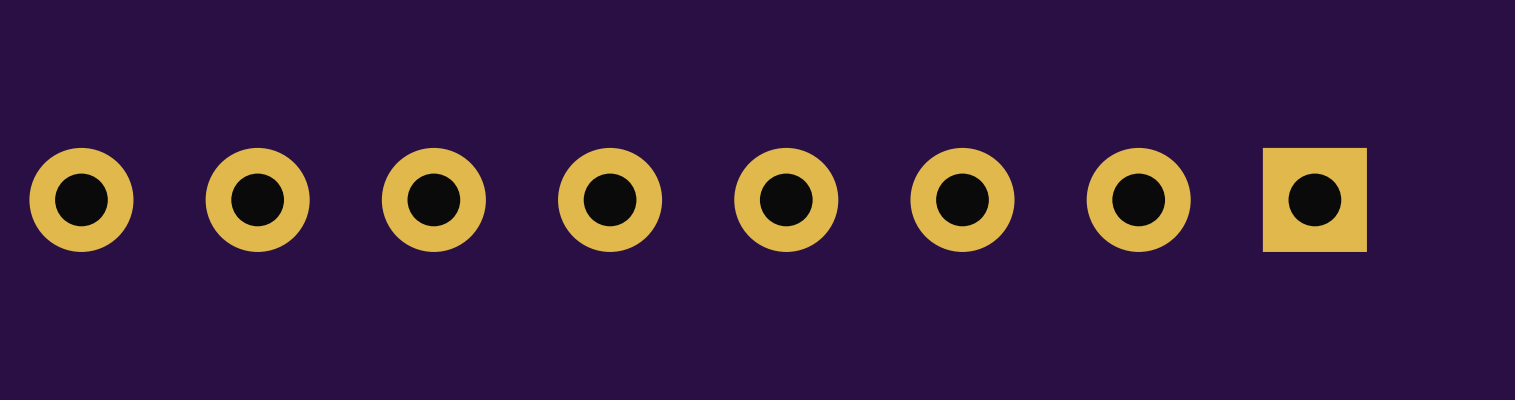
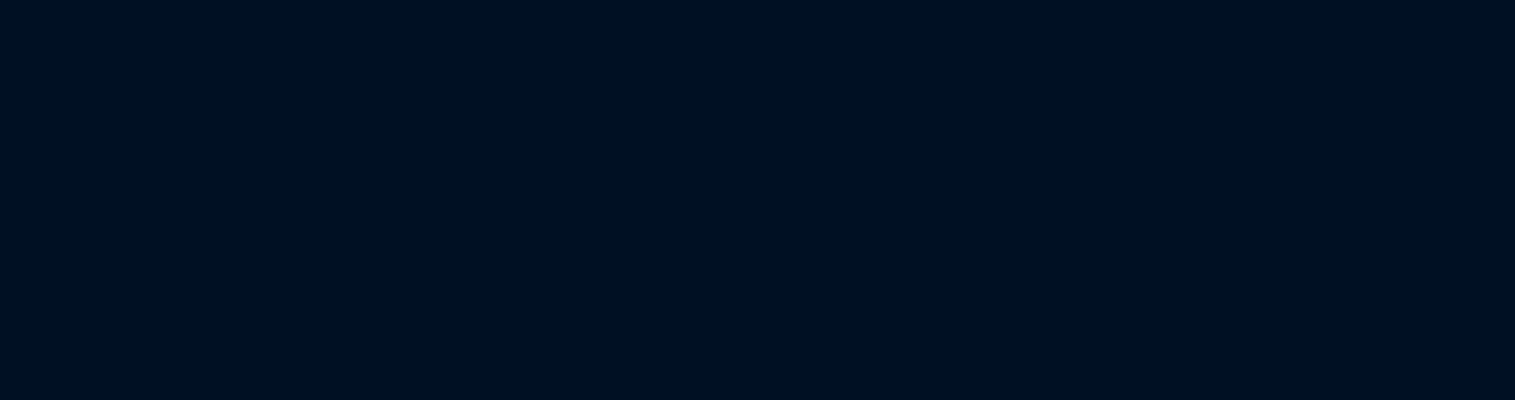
part: (698, 199) -> none

